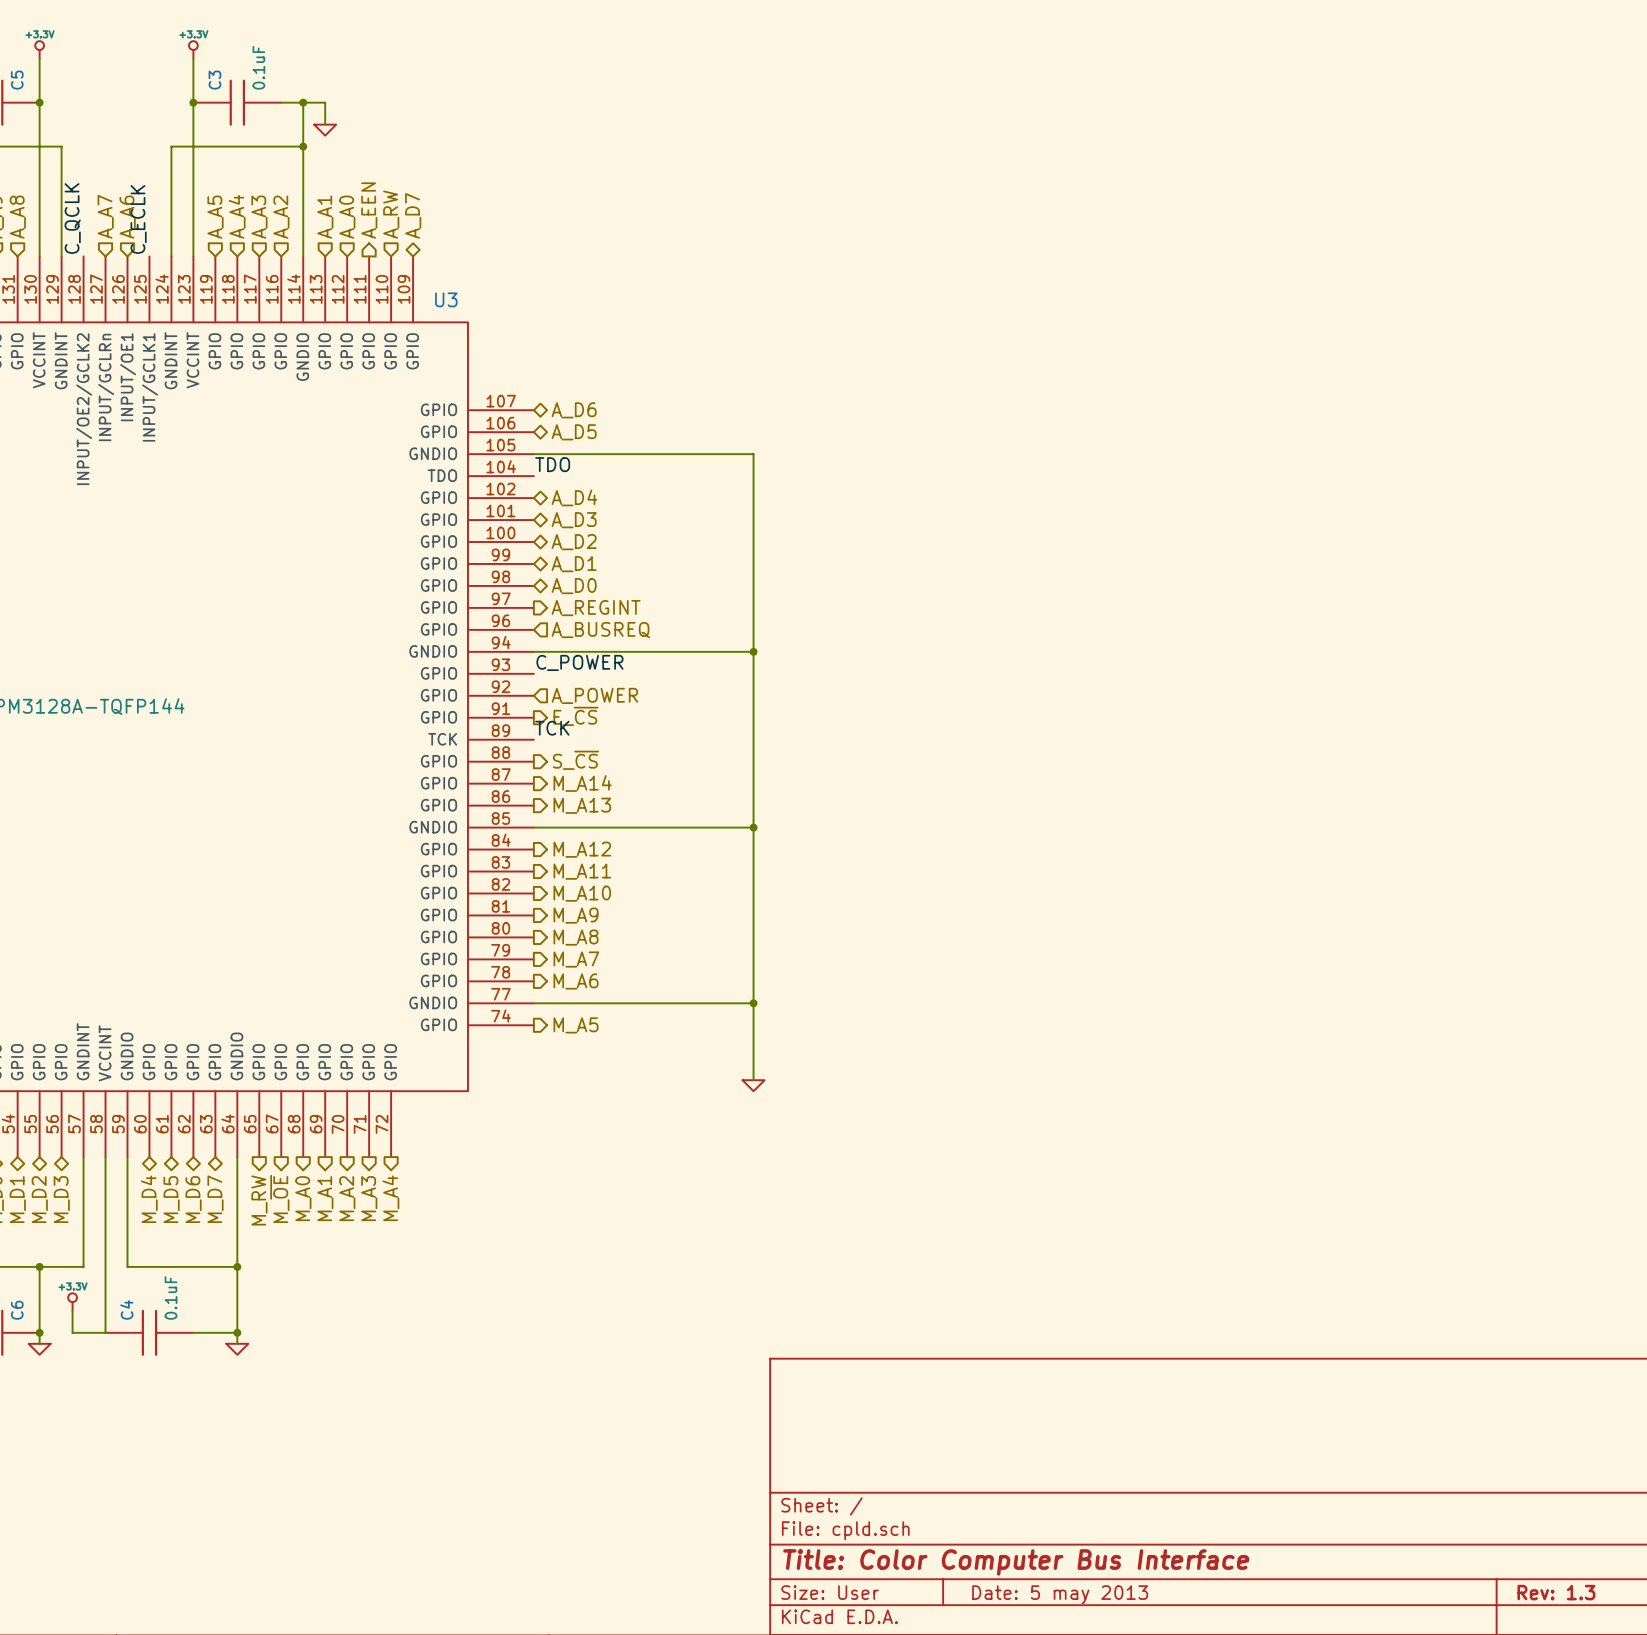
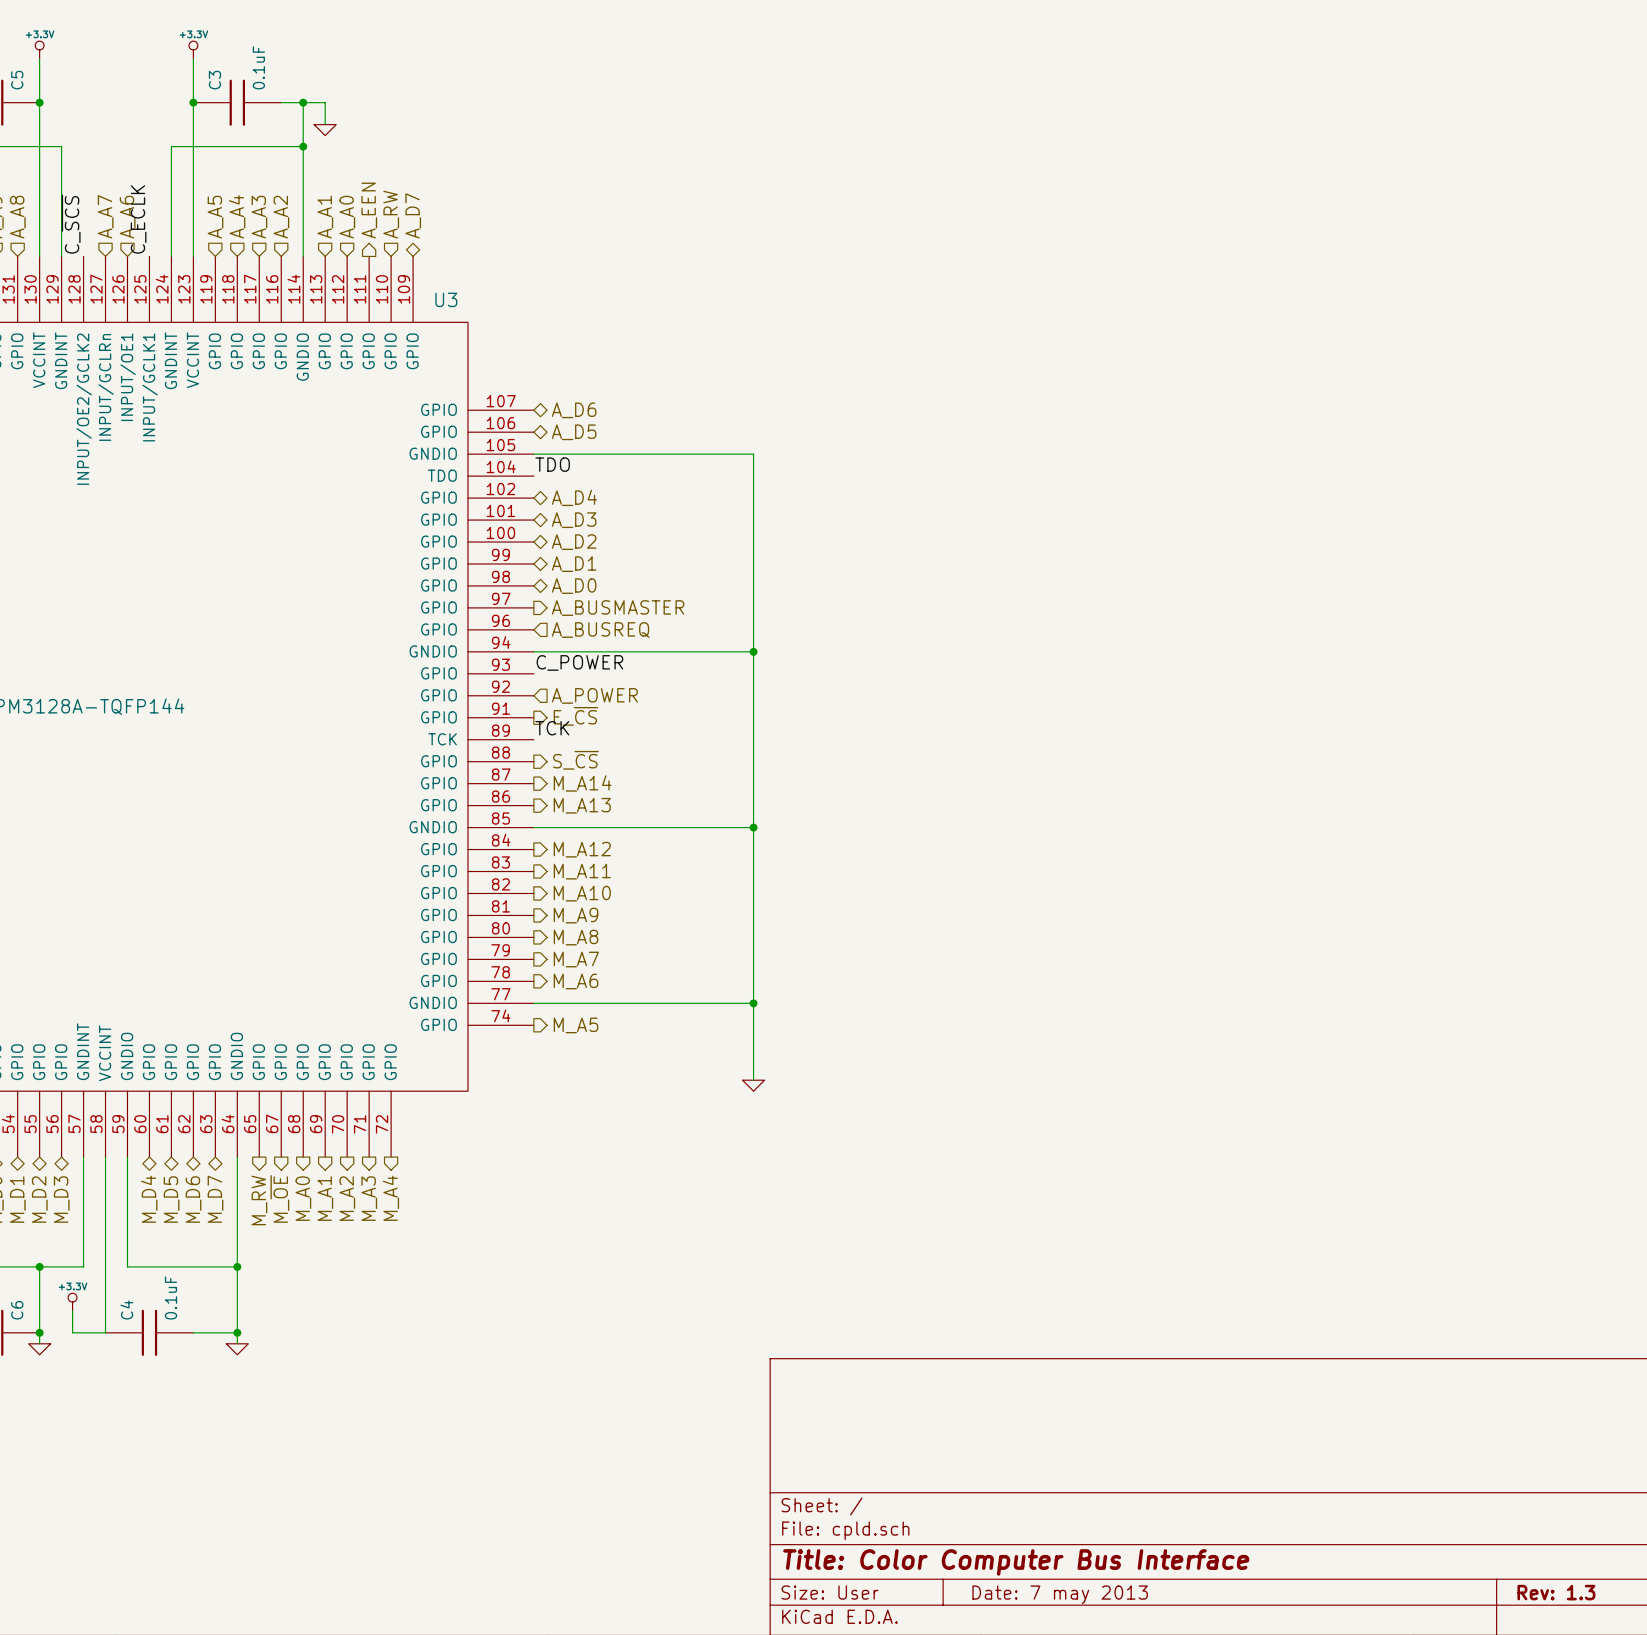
label: C_QCLK (72, 218) -> C_~{SCS} (71, 224)
hierarchical label: A_REGINT (596, 608) -> A_BUSMASTER (618, 608)
title block: Date: 5 may 2013 (1060, 1594) -> Date: 7 may 2013 (1060, 1594)

